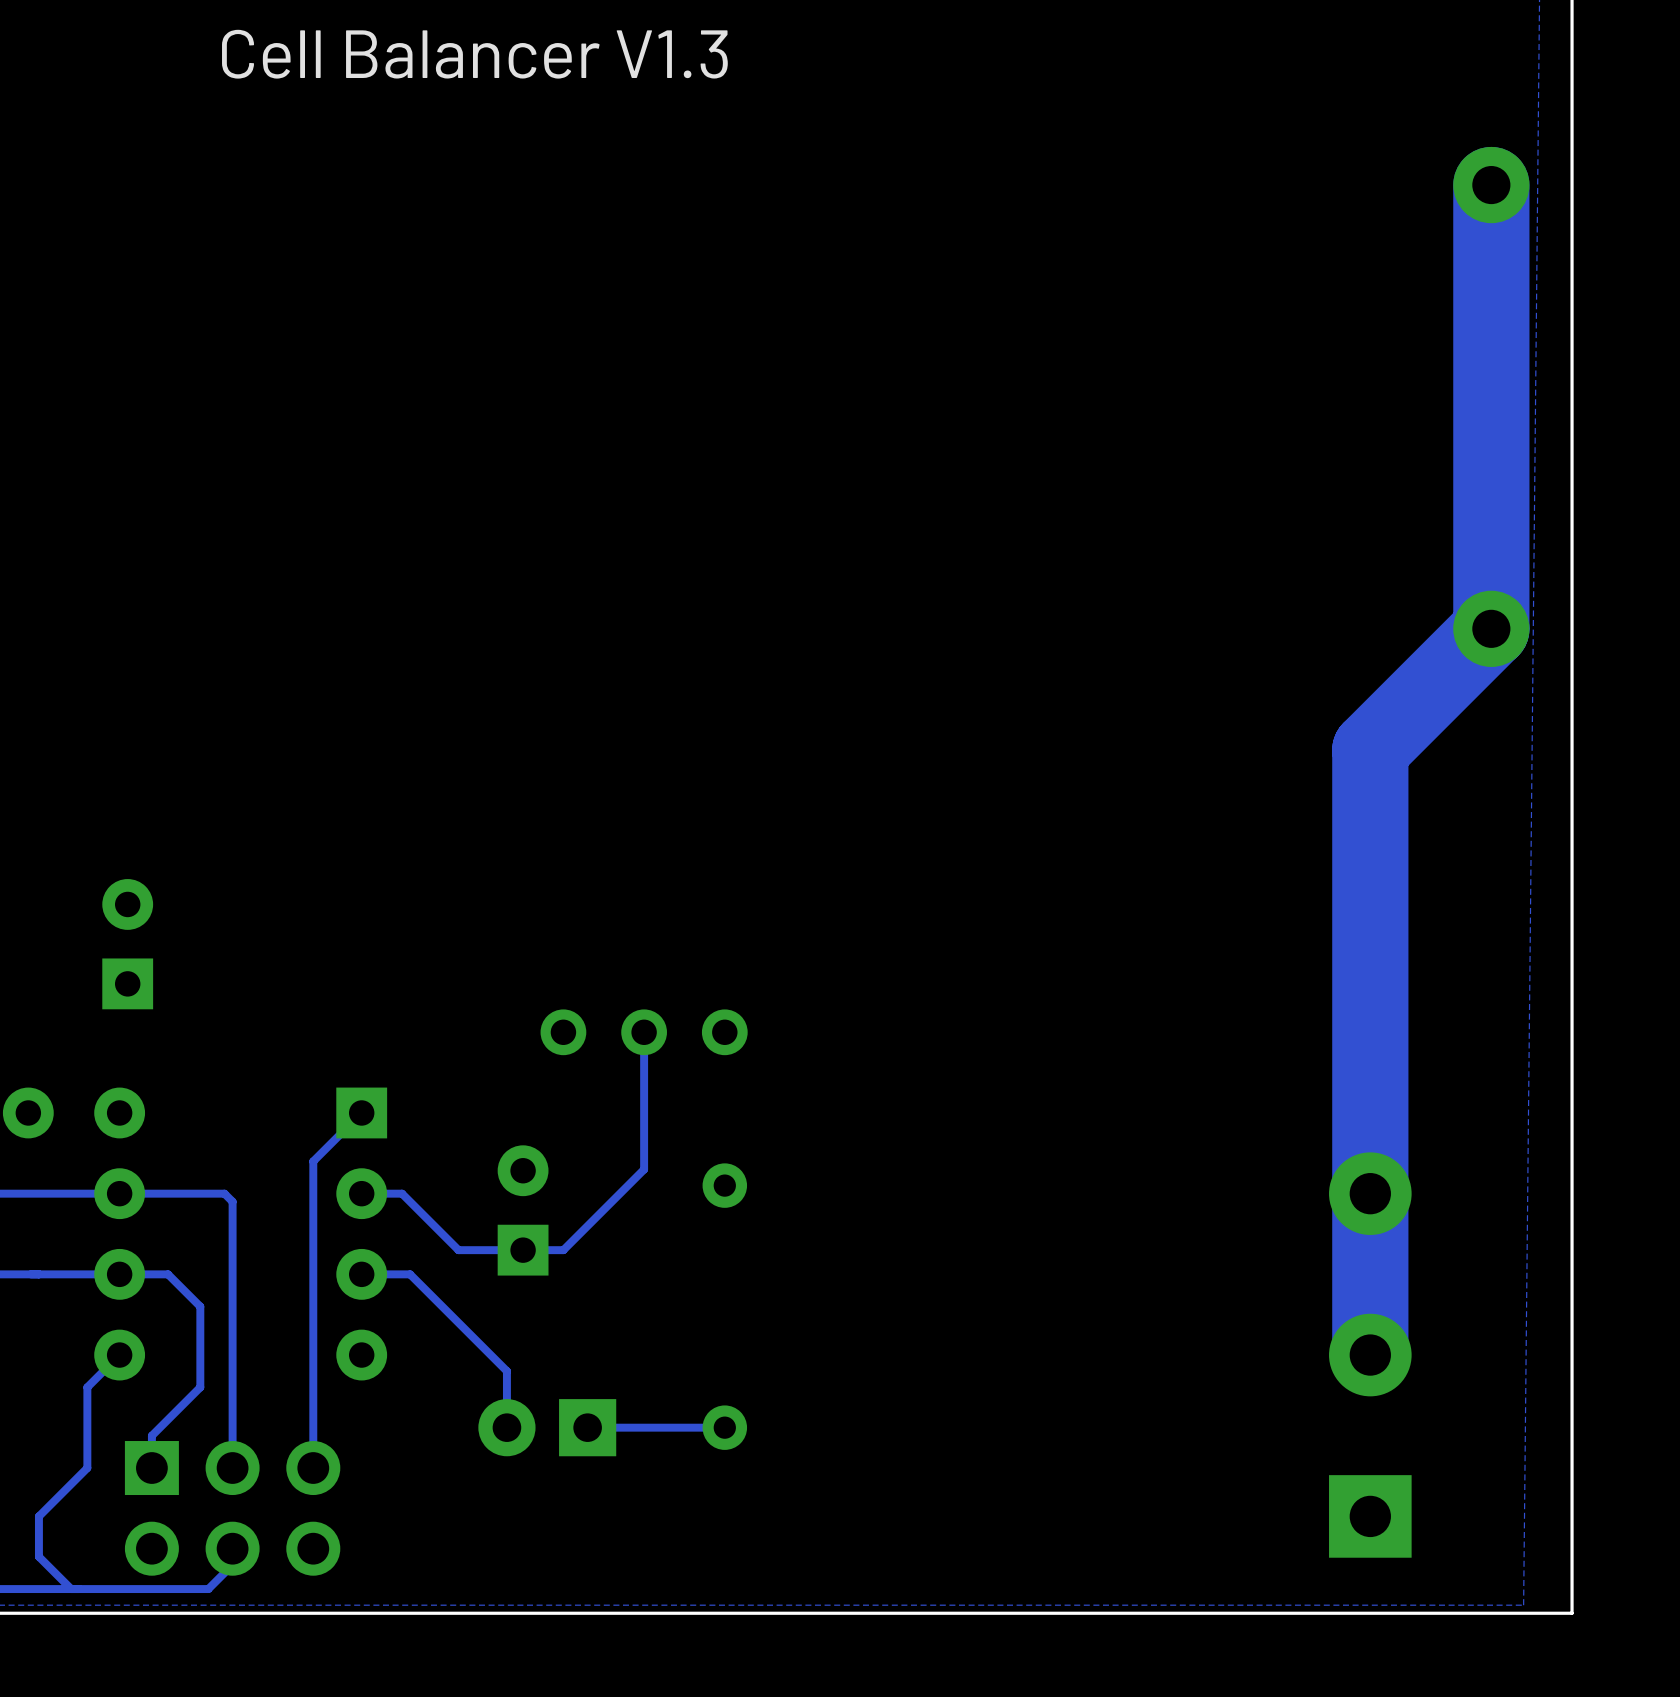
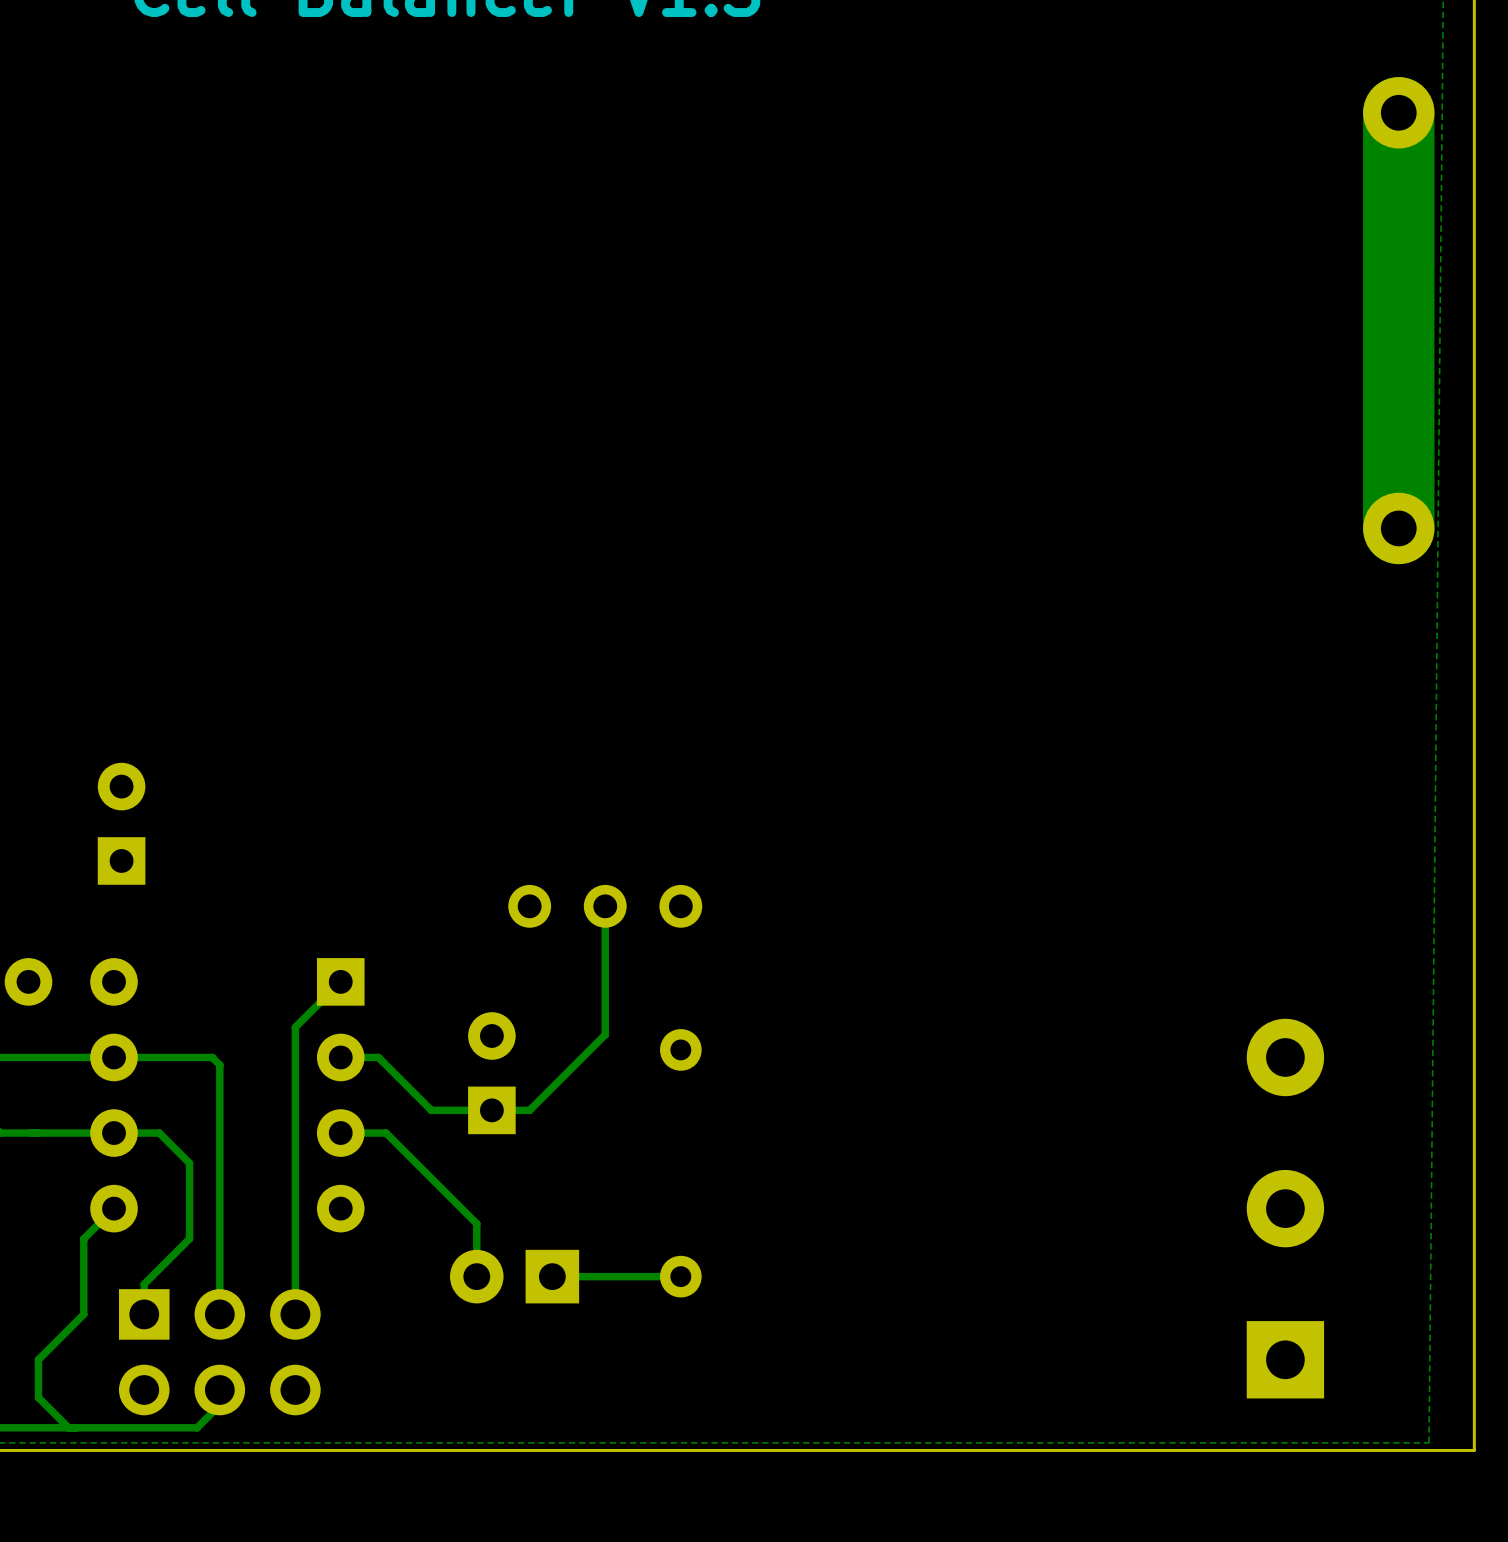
track: (1491, 628) (1370, 749) (1370, 1355) -> none

